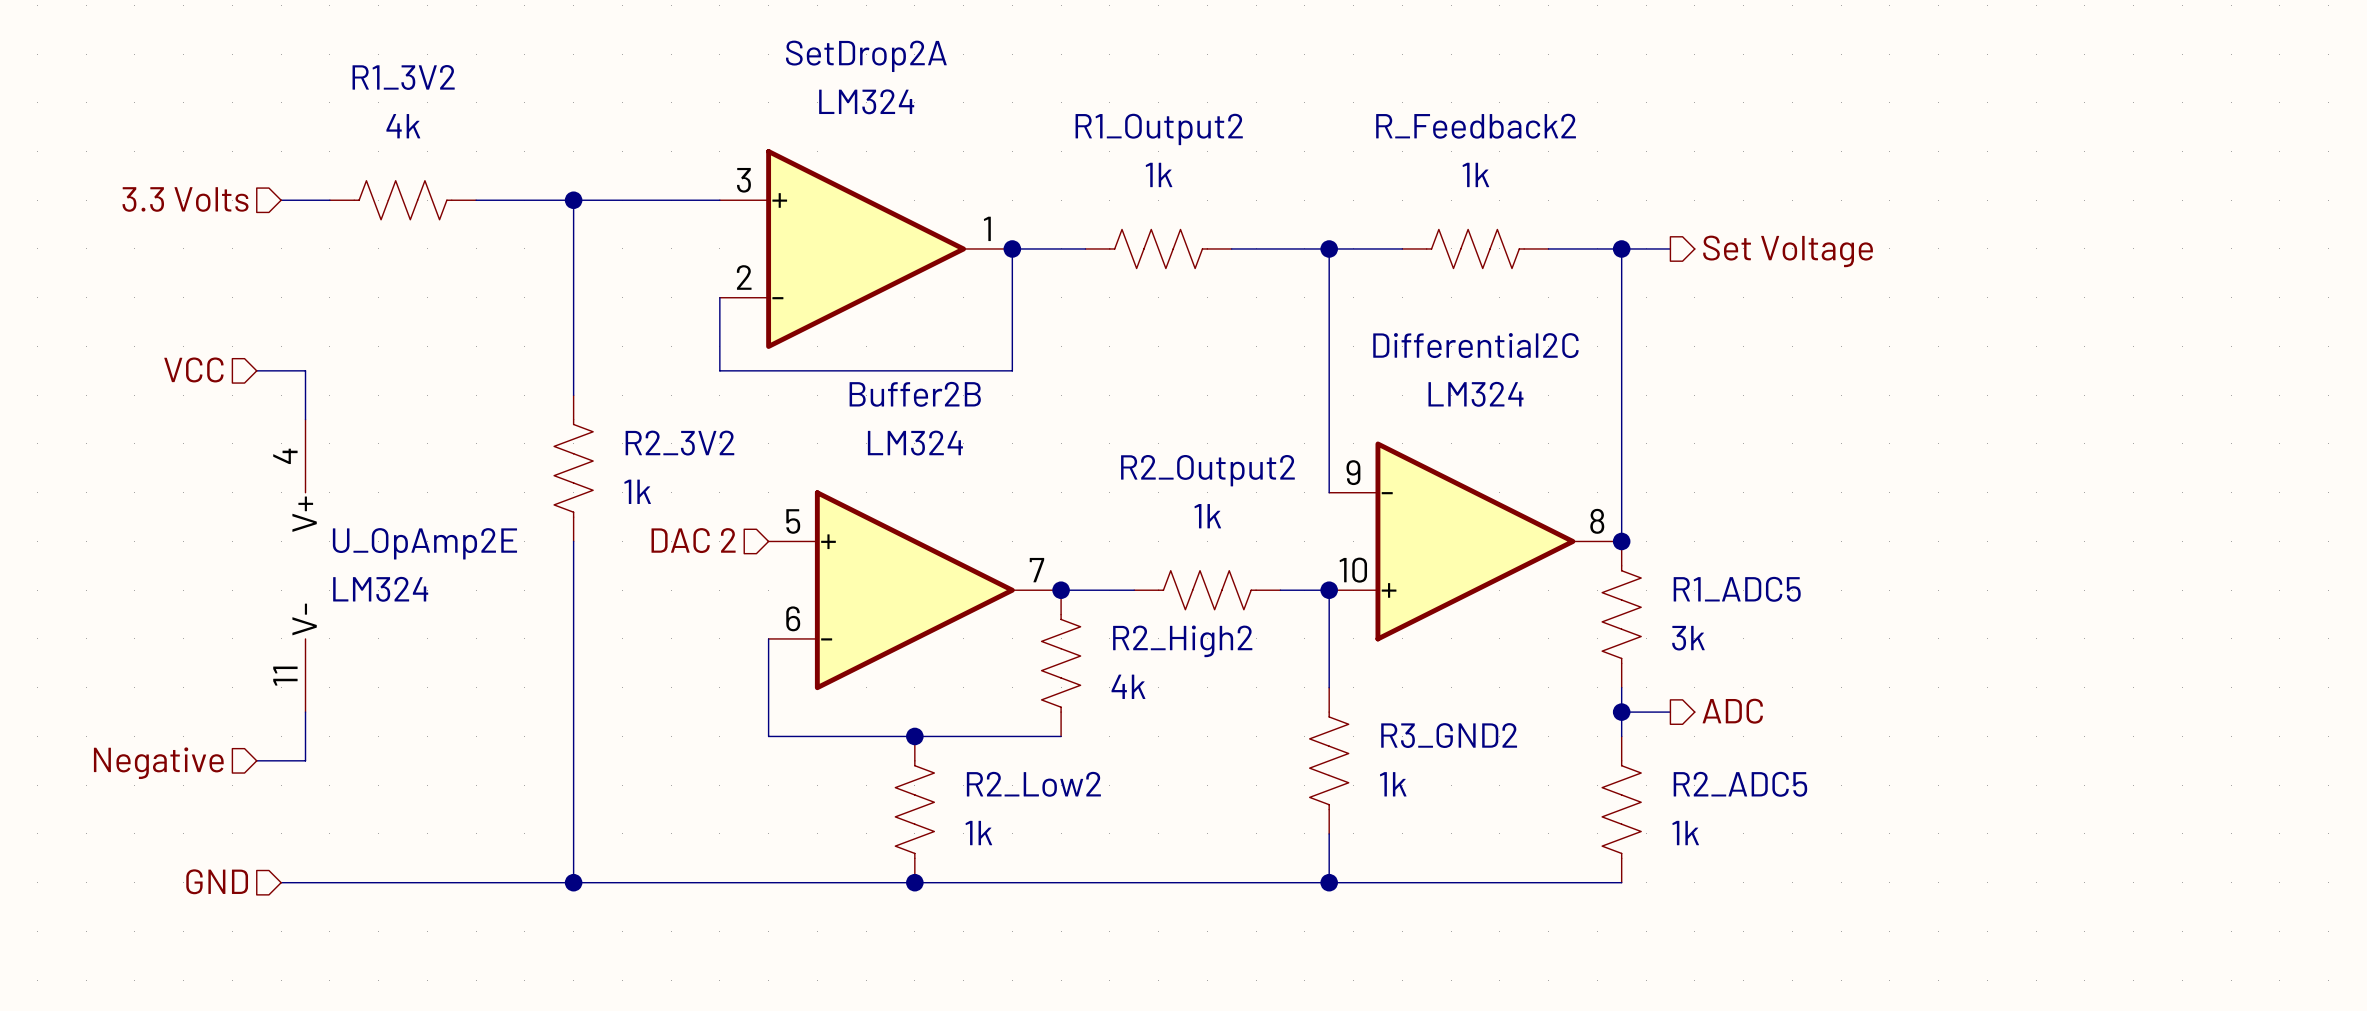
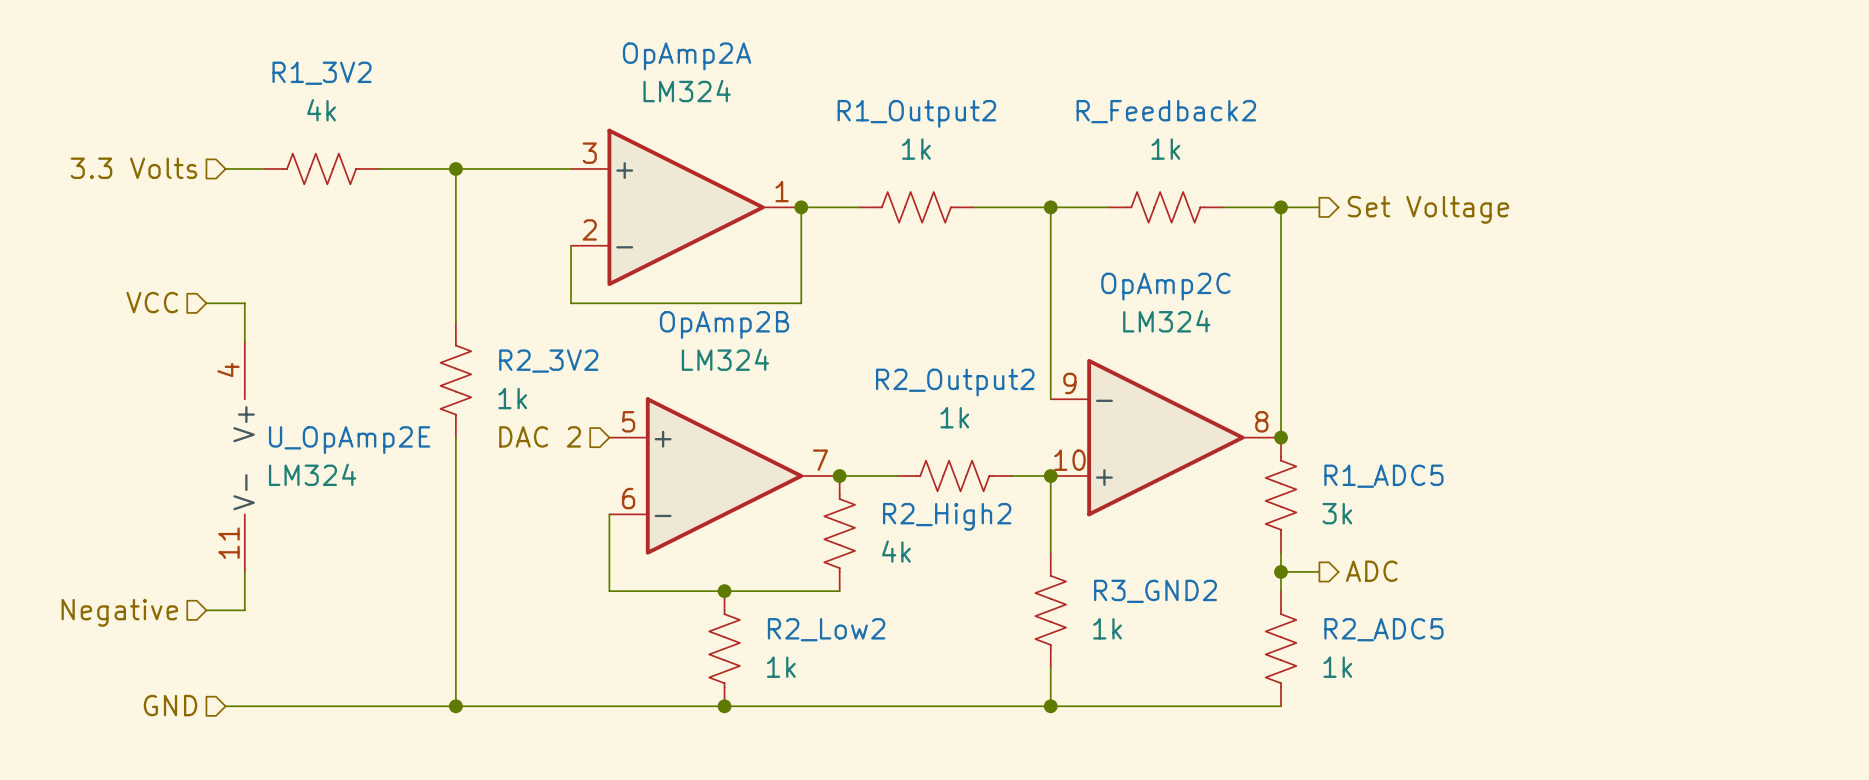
SetDrop2A name: SetDrop2A (866, 56) -> OpAmp2A (687, 56)
Differential2C name: Differential2C (1475, 345) -> OpAmp2C (1165, 286)
Buffer2B name: Buffer2B (915, 394) -> OpAmp2B (724, 324)

